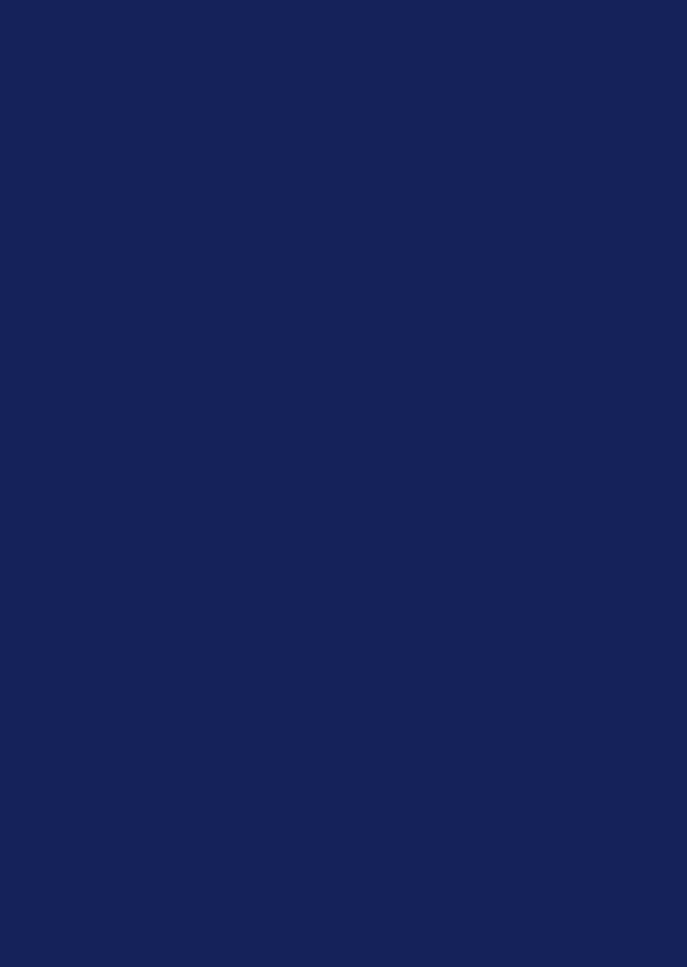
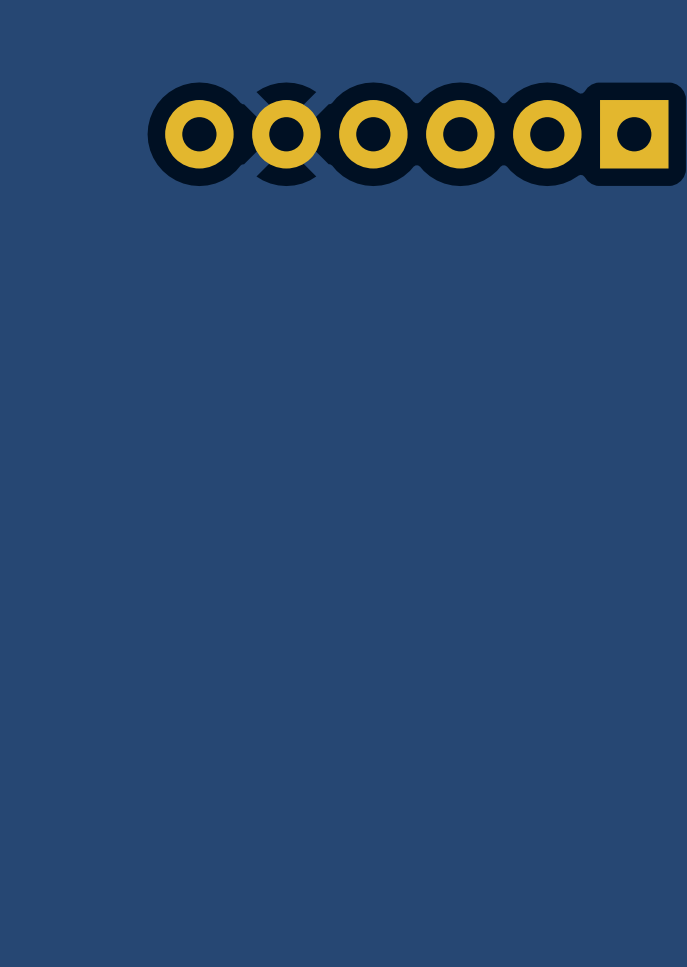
part: none -> (416, 134)

